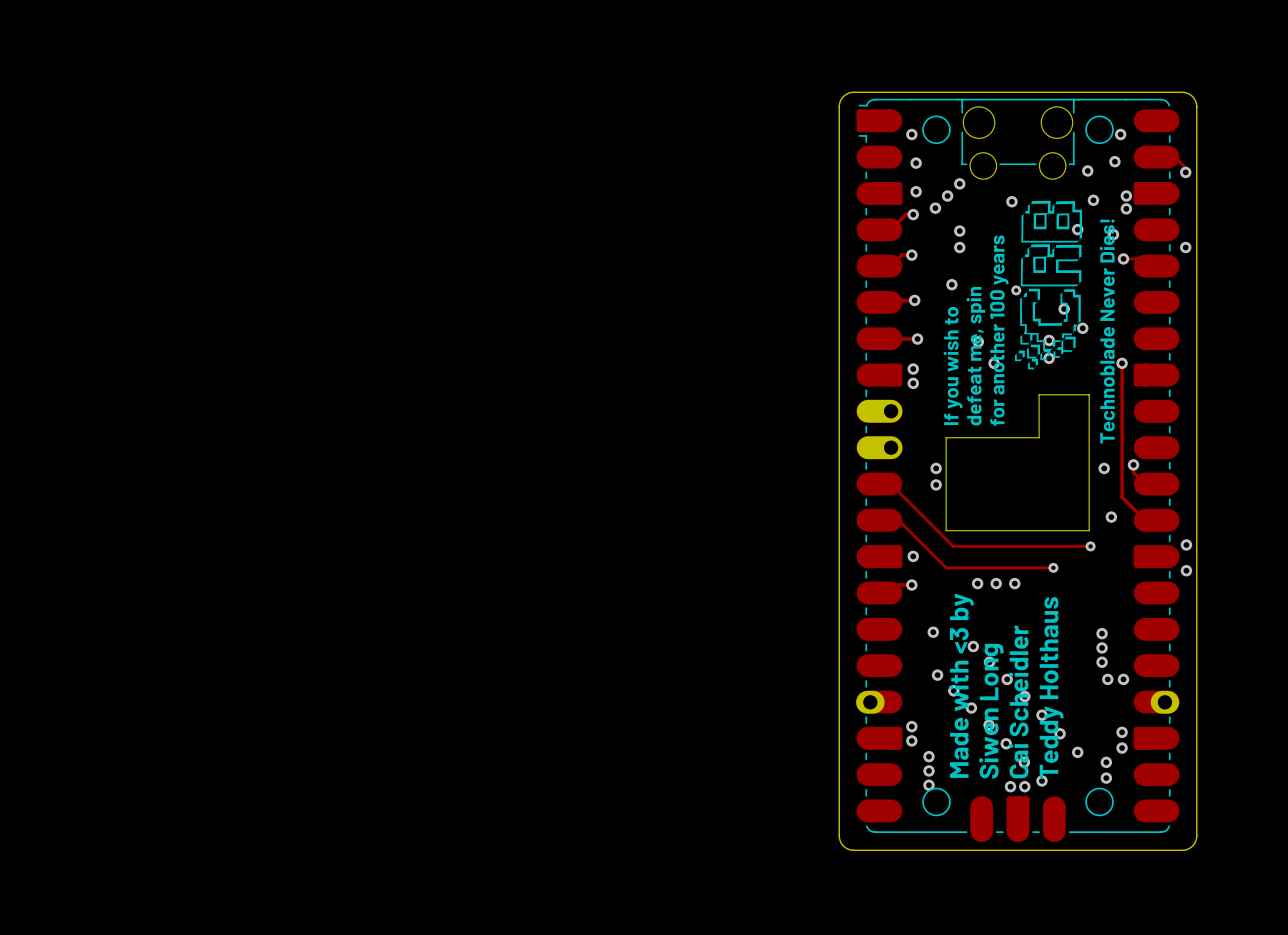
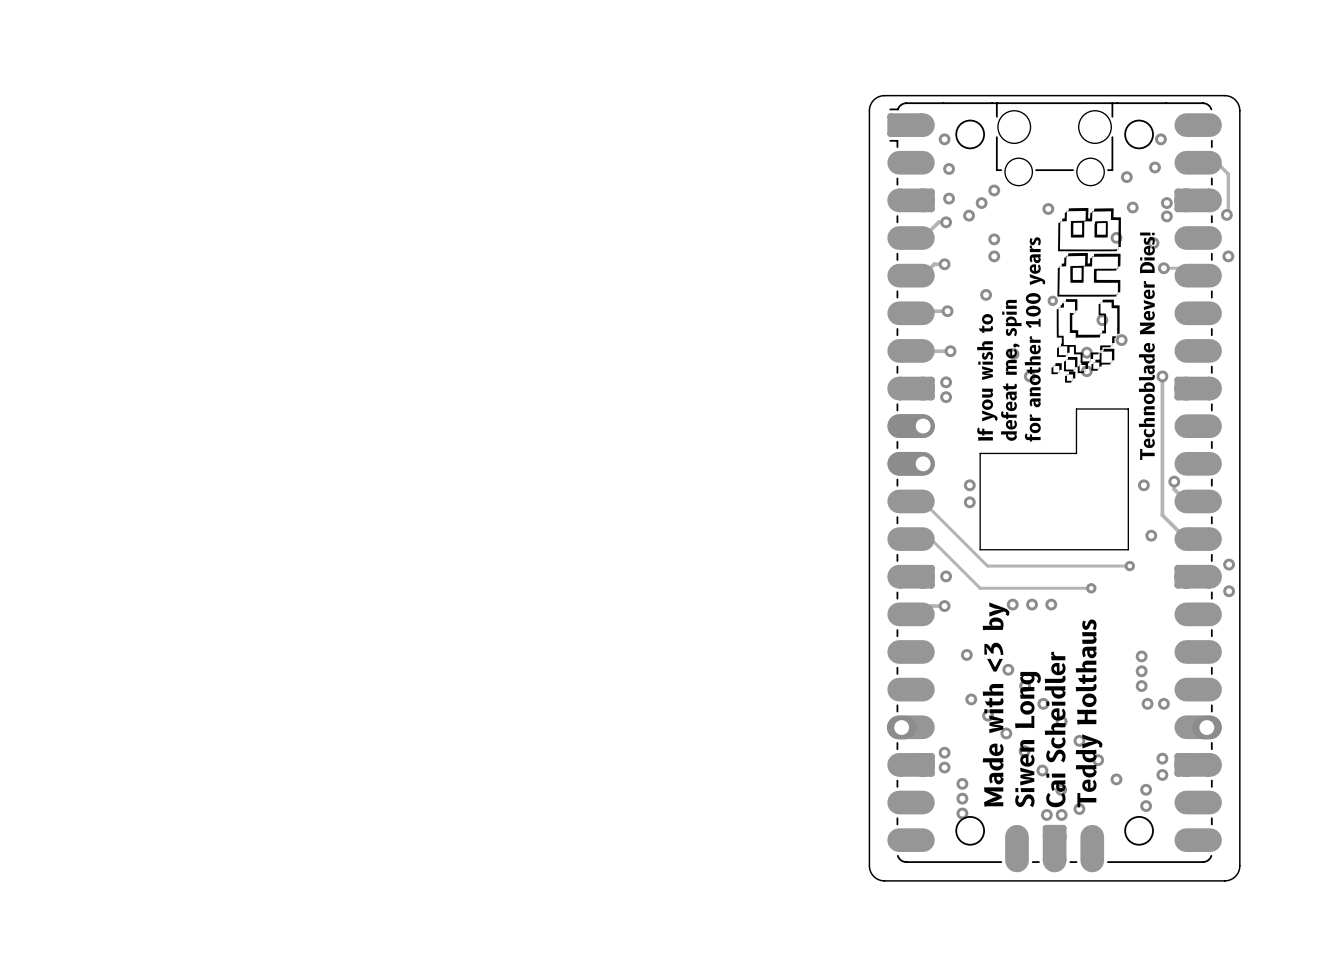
track: none -> (1228, 178) (1226, 214)
via position: (1185, 172) -> (1226, 214)

